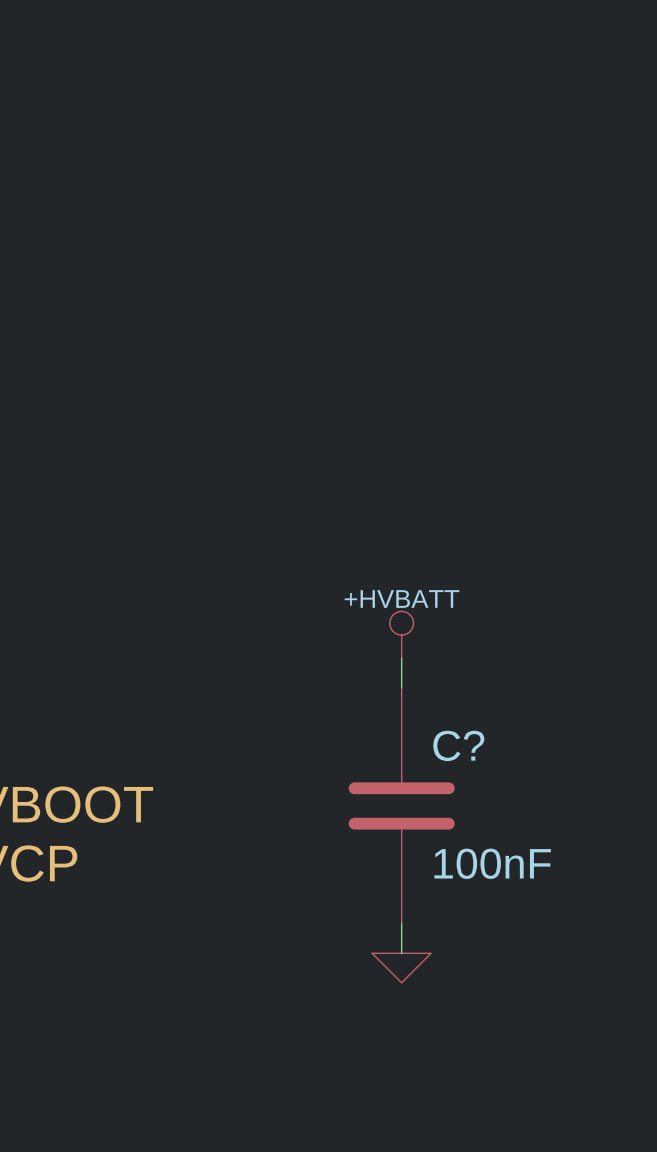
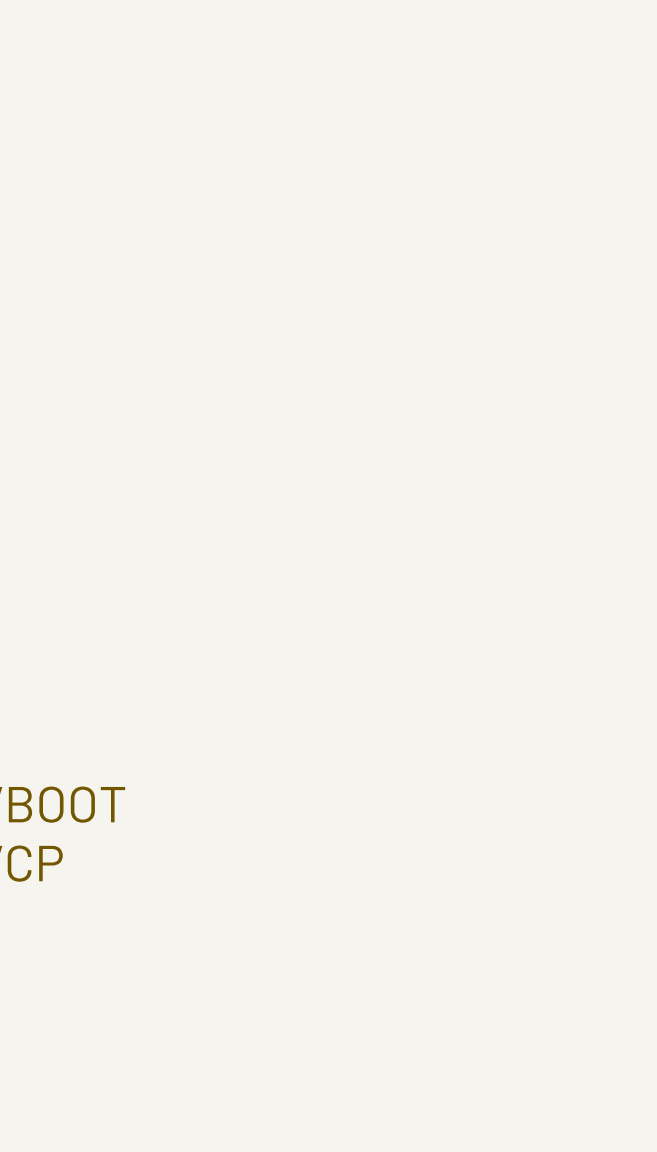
power symbol: +HVBATT (401, 635) -> none
wire: (401, 658) (401, 688) -> none
C?: 100nF (401, 805) -> none
wire: (401, 923) (401, 953) -> none
power symbol: (401, 968) -> none

